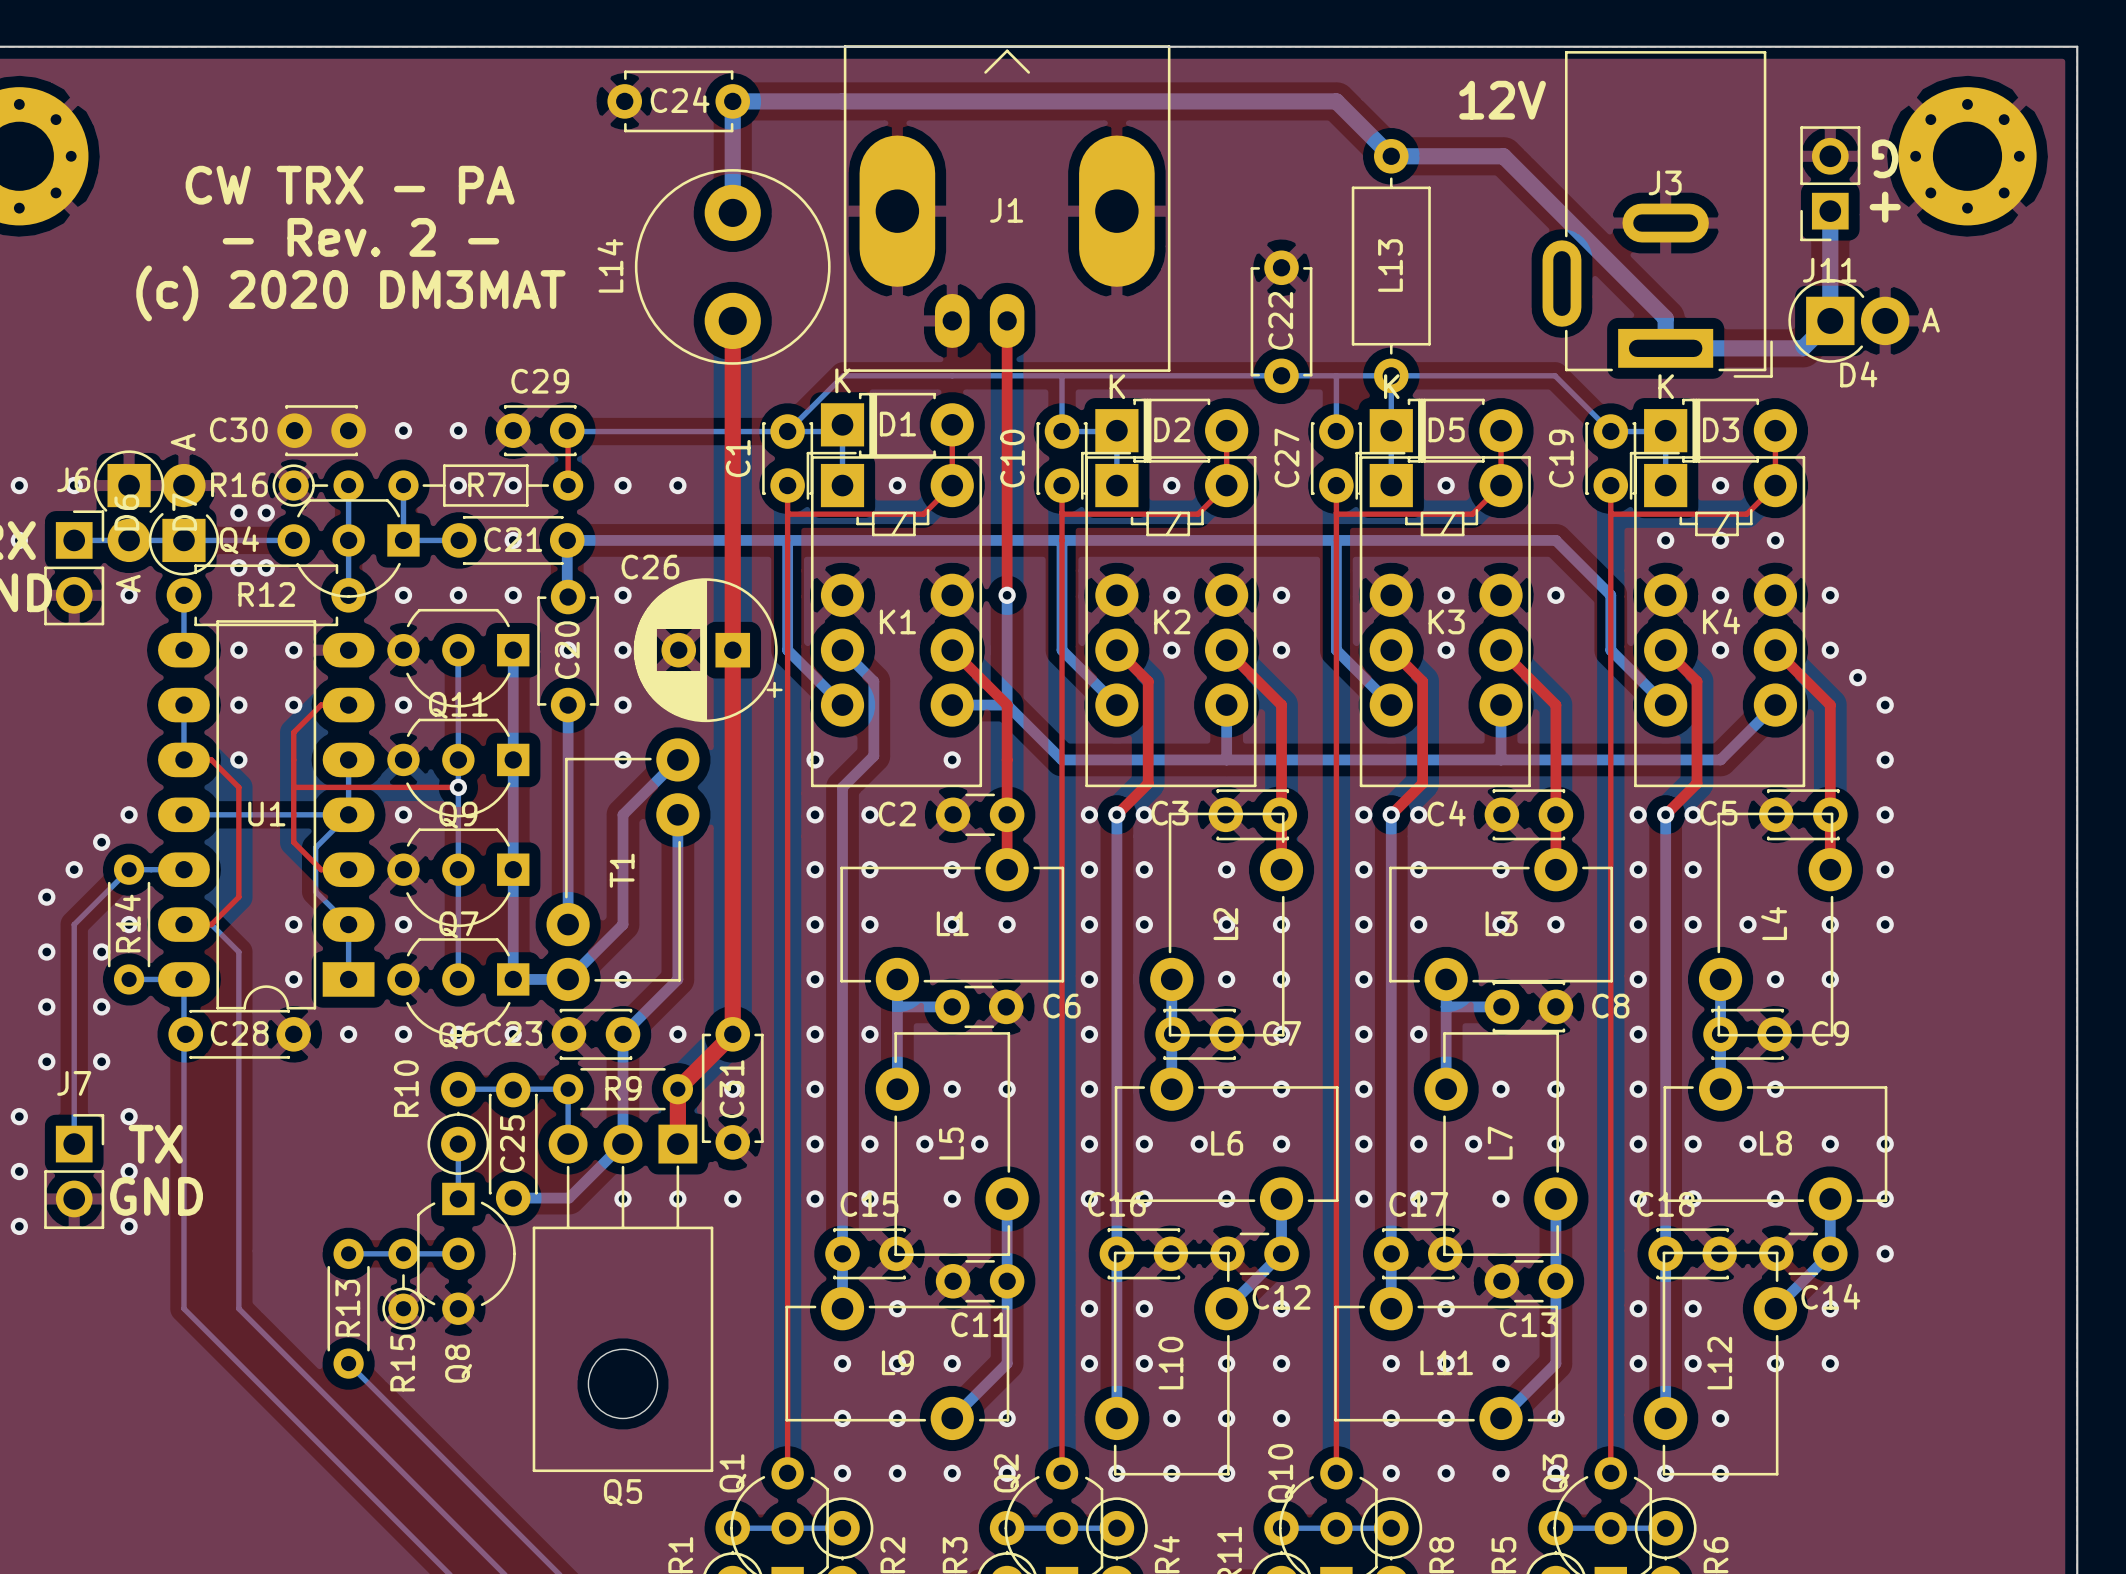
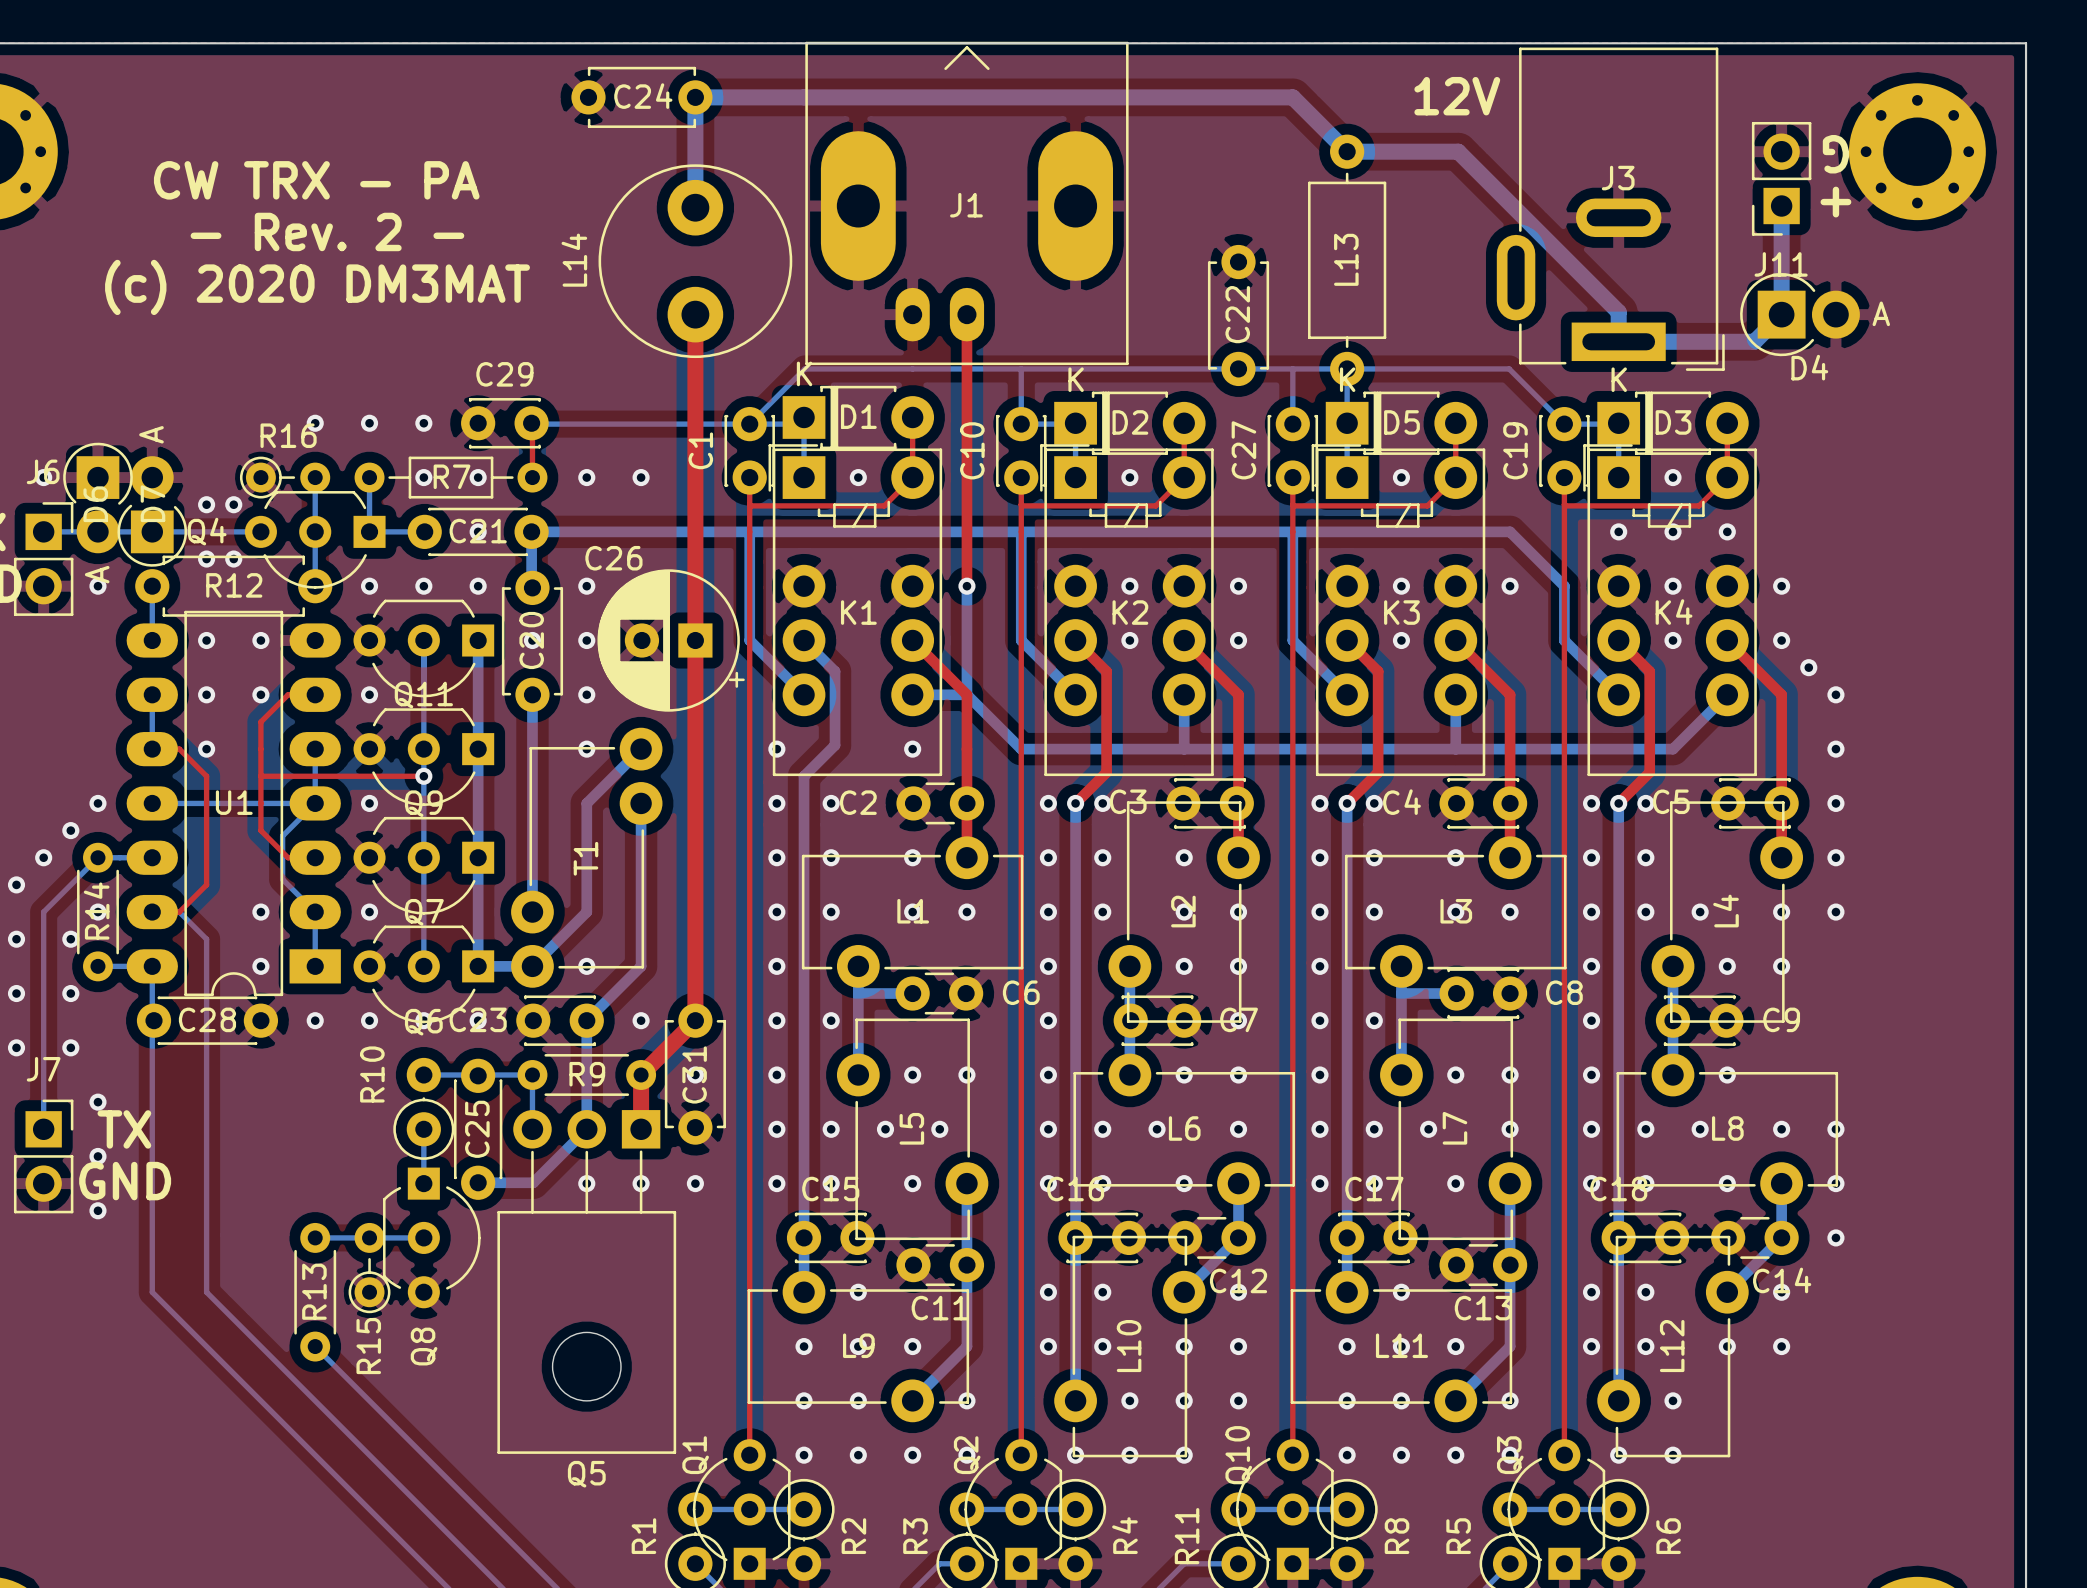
C30: (321, 430) -> none
via: none -> (315, 423)
R16 name position: R16 (239, 484) -> R16 (288, 435)

